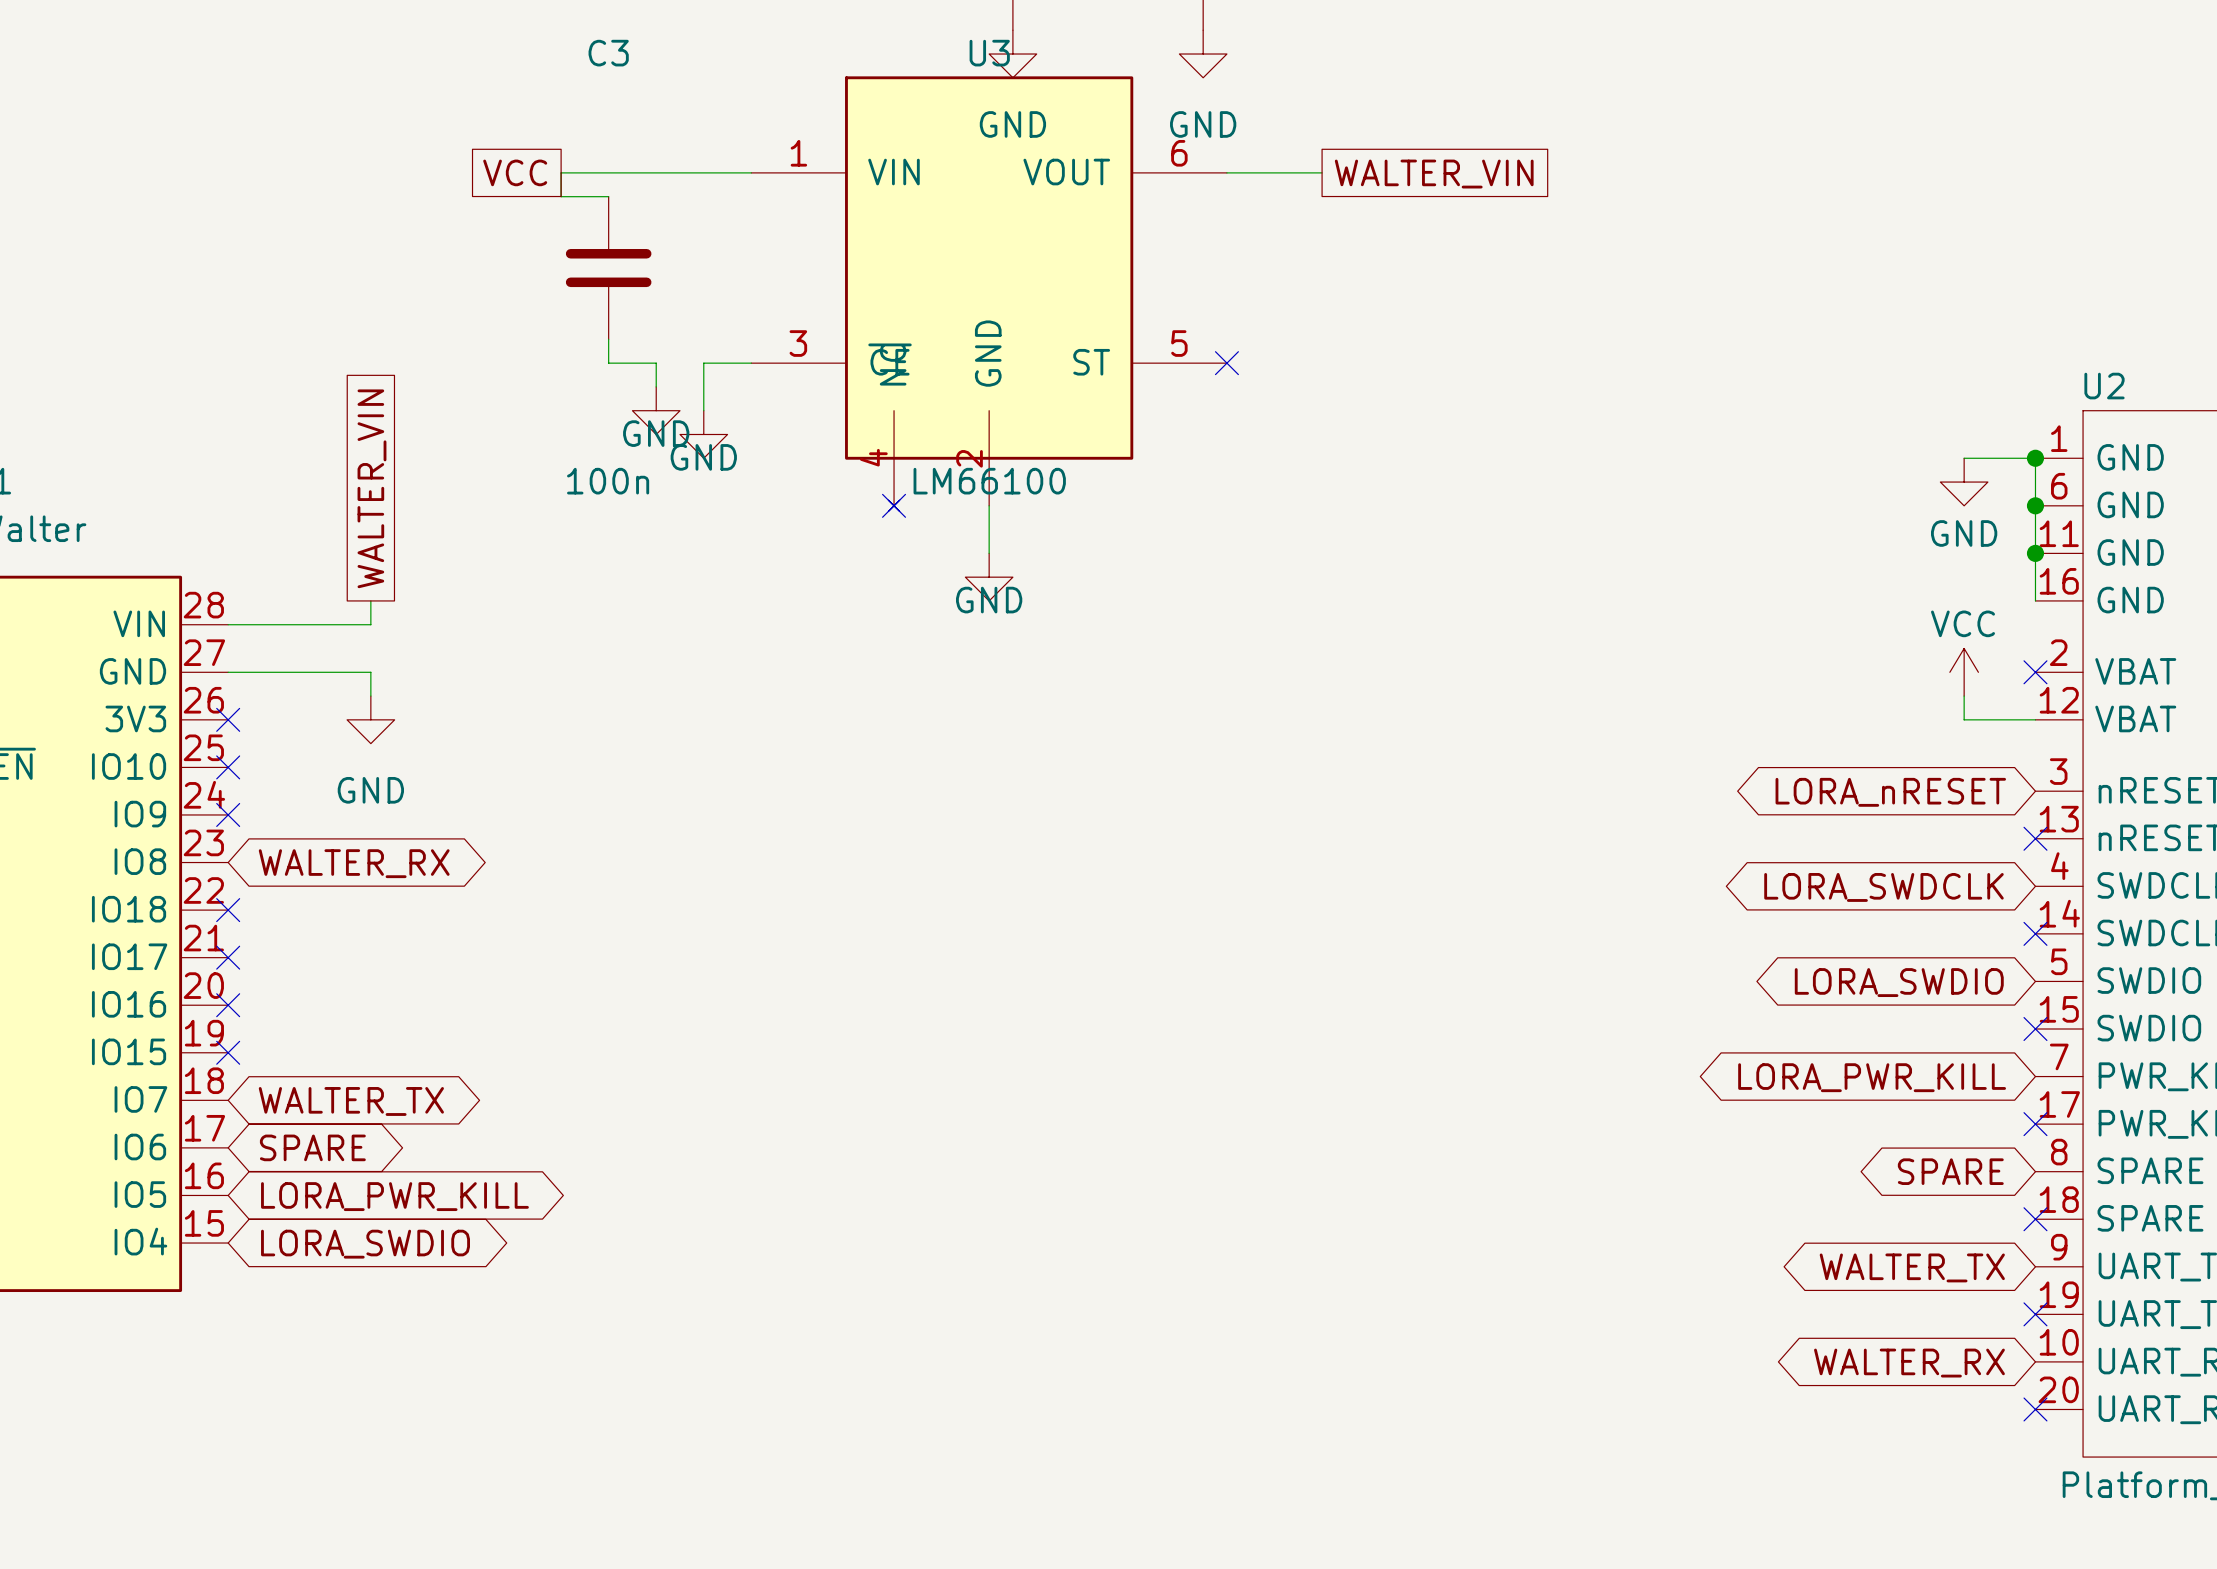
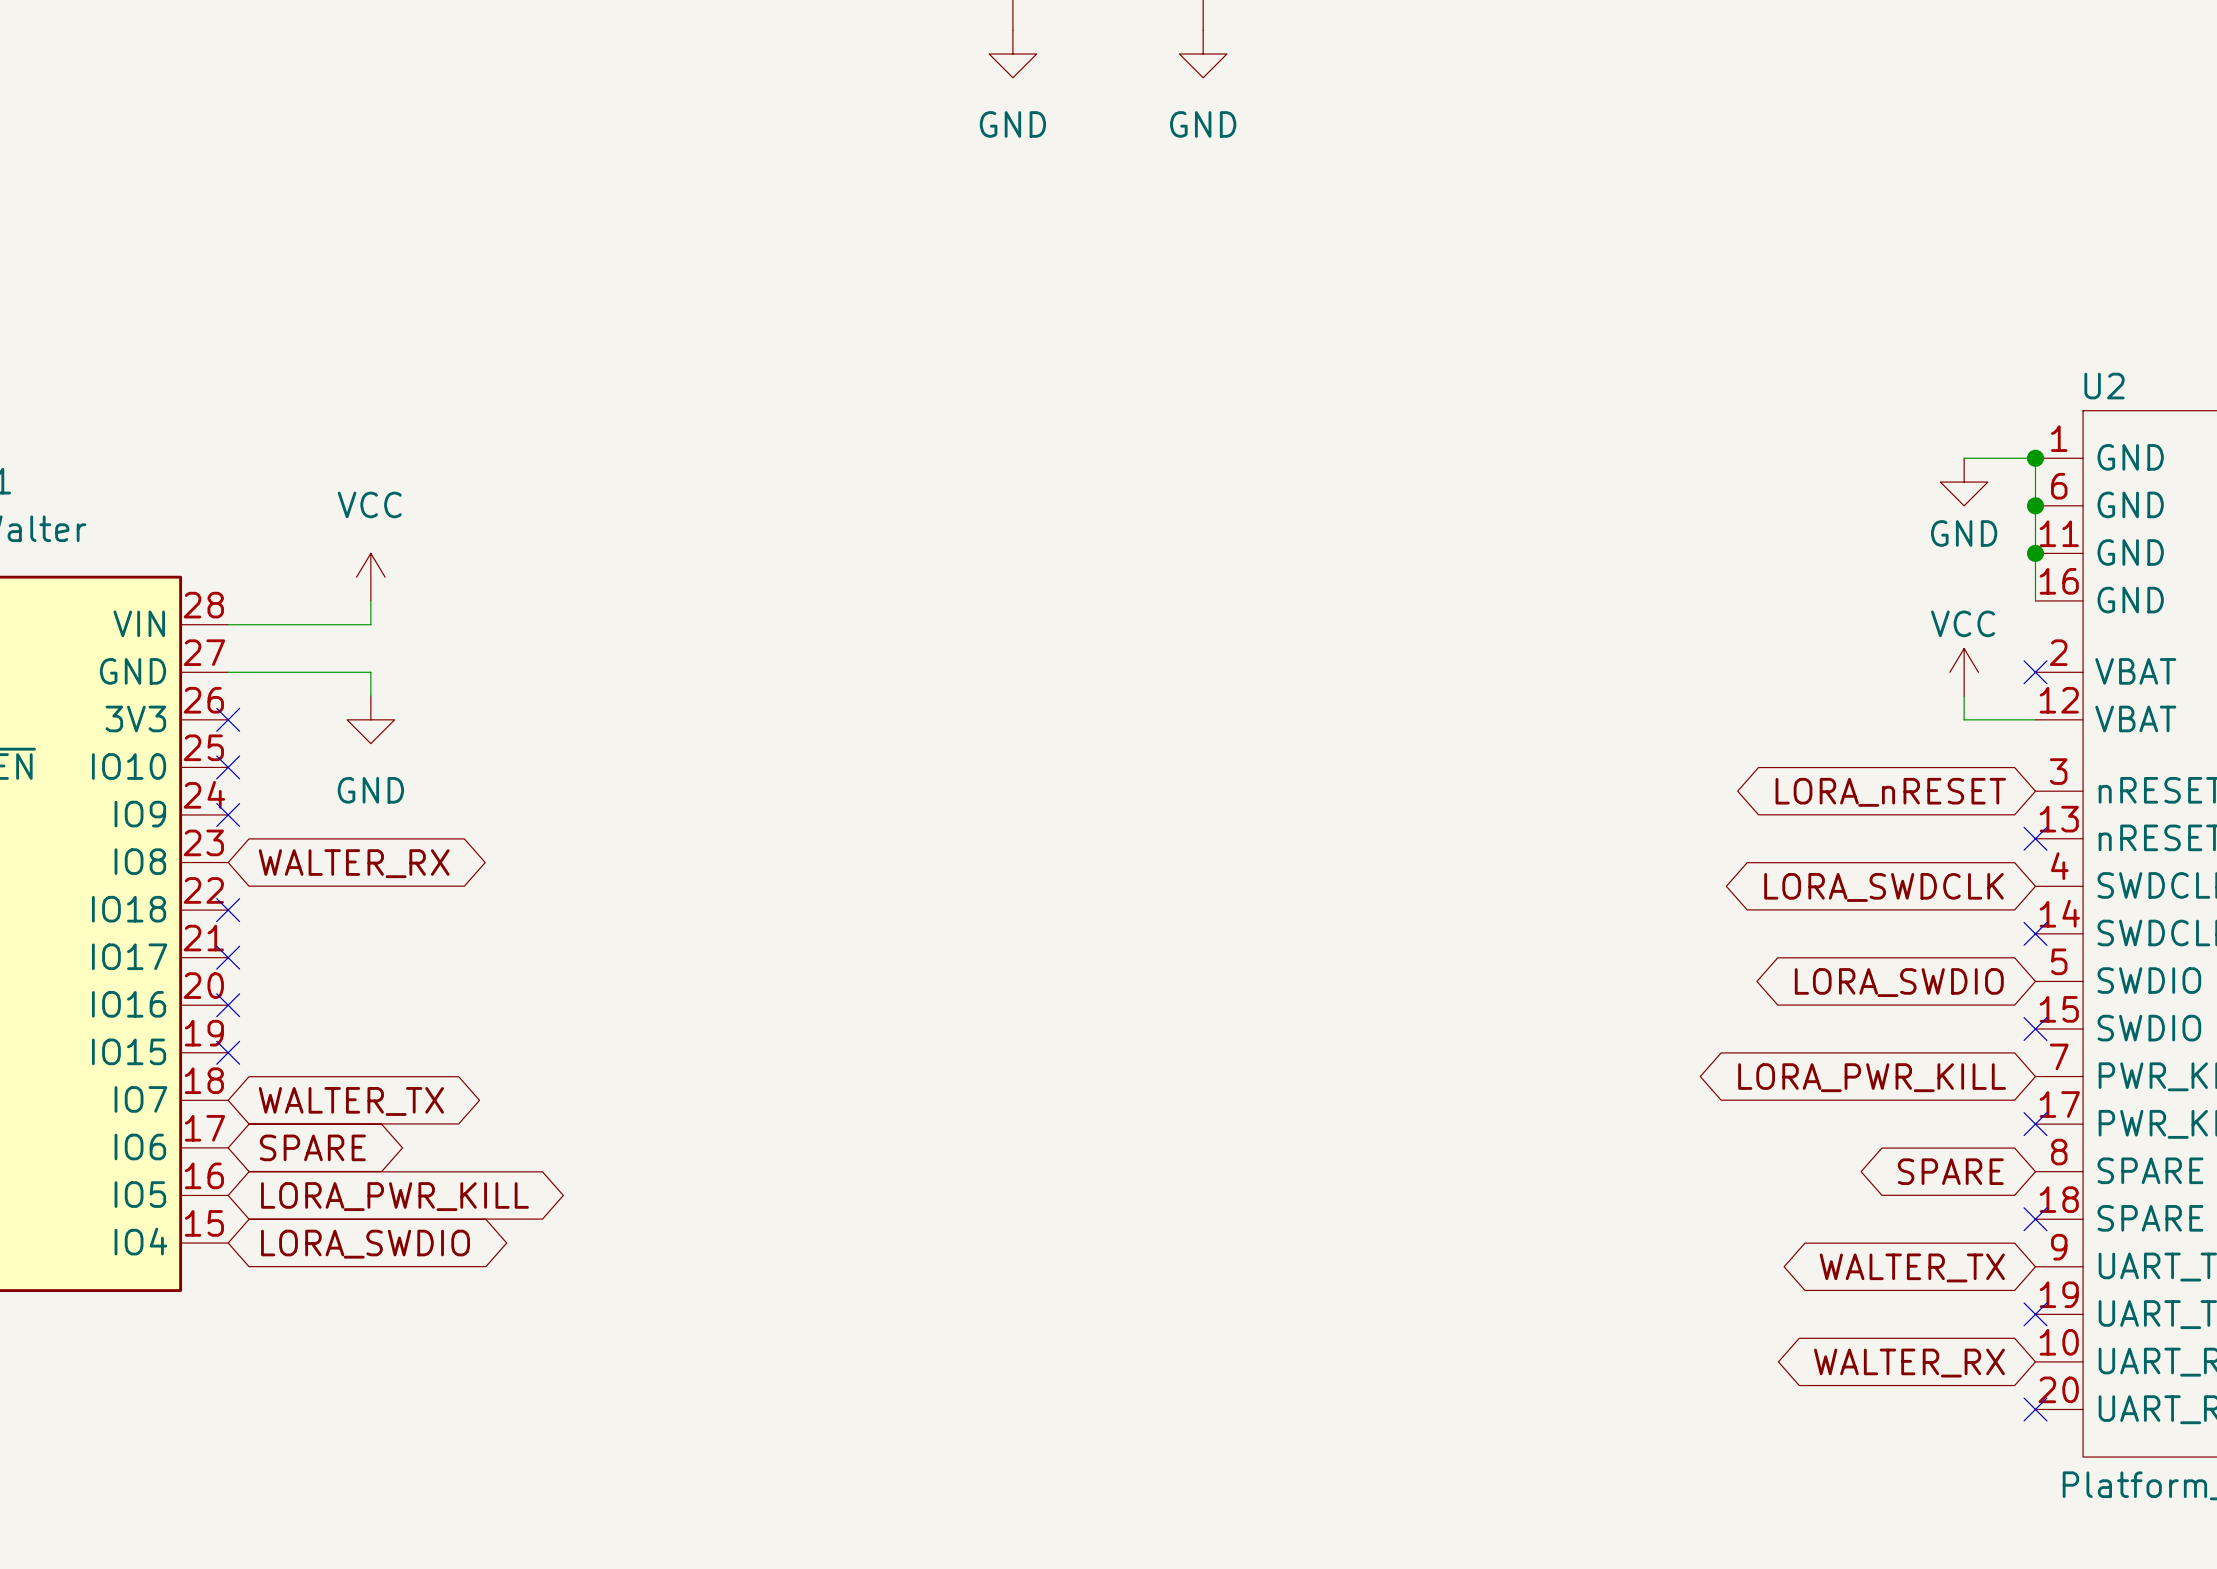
global label: VCC (515, 172) -> none
wire: (751, 172) (561, 172) (561, 196) (608, 196) -> none
wire: (1226, 172) (1322, 172) -> none
global label: WALTER_VIN (1434, 174) -> none
C3: 100n (608, 268) -> none
U3: LM66100 (989, 293) -> none
wire: (608, 339) (608, 363) (656, 363) (656, 386) -> none
wire: (751, 363) (703, 363) (703, 410) -> none
no-connect mark: (1226, 363) -> none
power symbol: GND (656, 410) -> none
power symbol: GND (703, 434) -> none
global label: WALTER_VIN (371, 488) -> none
no-connect mark: (894, 505) -> none
wire: (989, 505) (989, 553) -> none
power symbol: none -> VCC (370, 577)
power symbol: GND (989, 577) -> none

